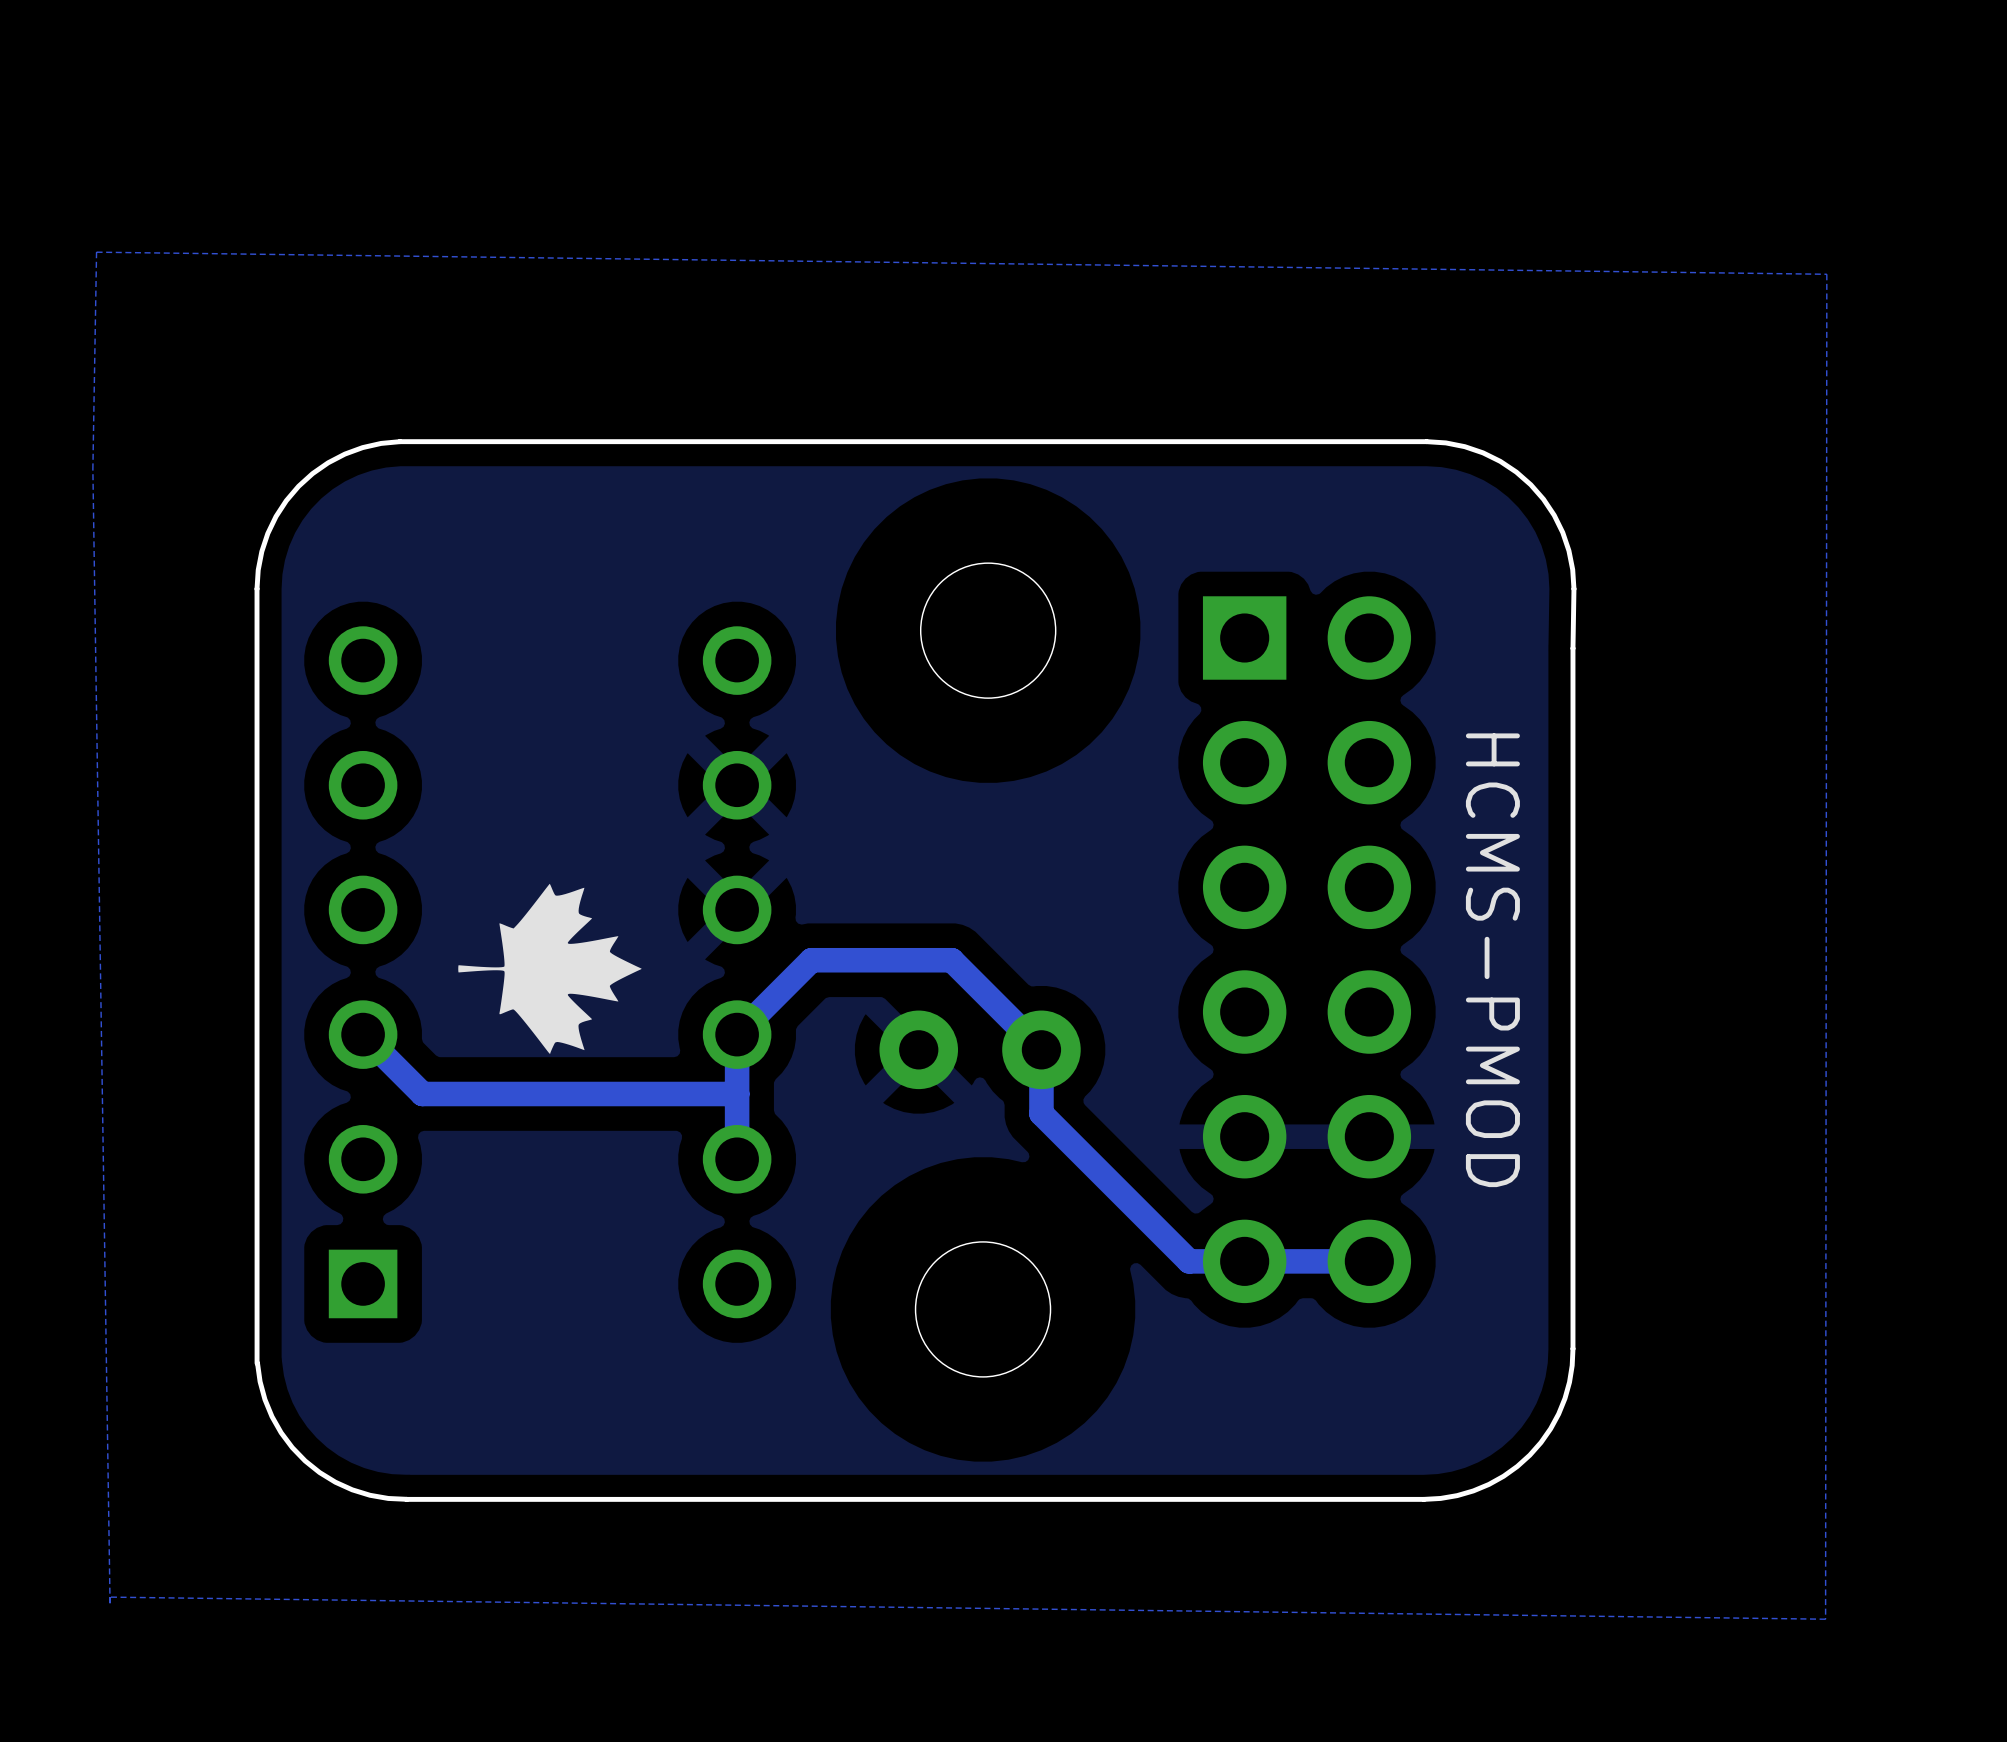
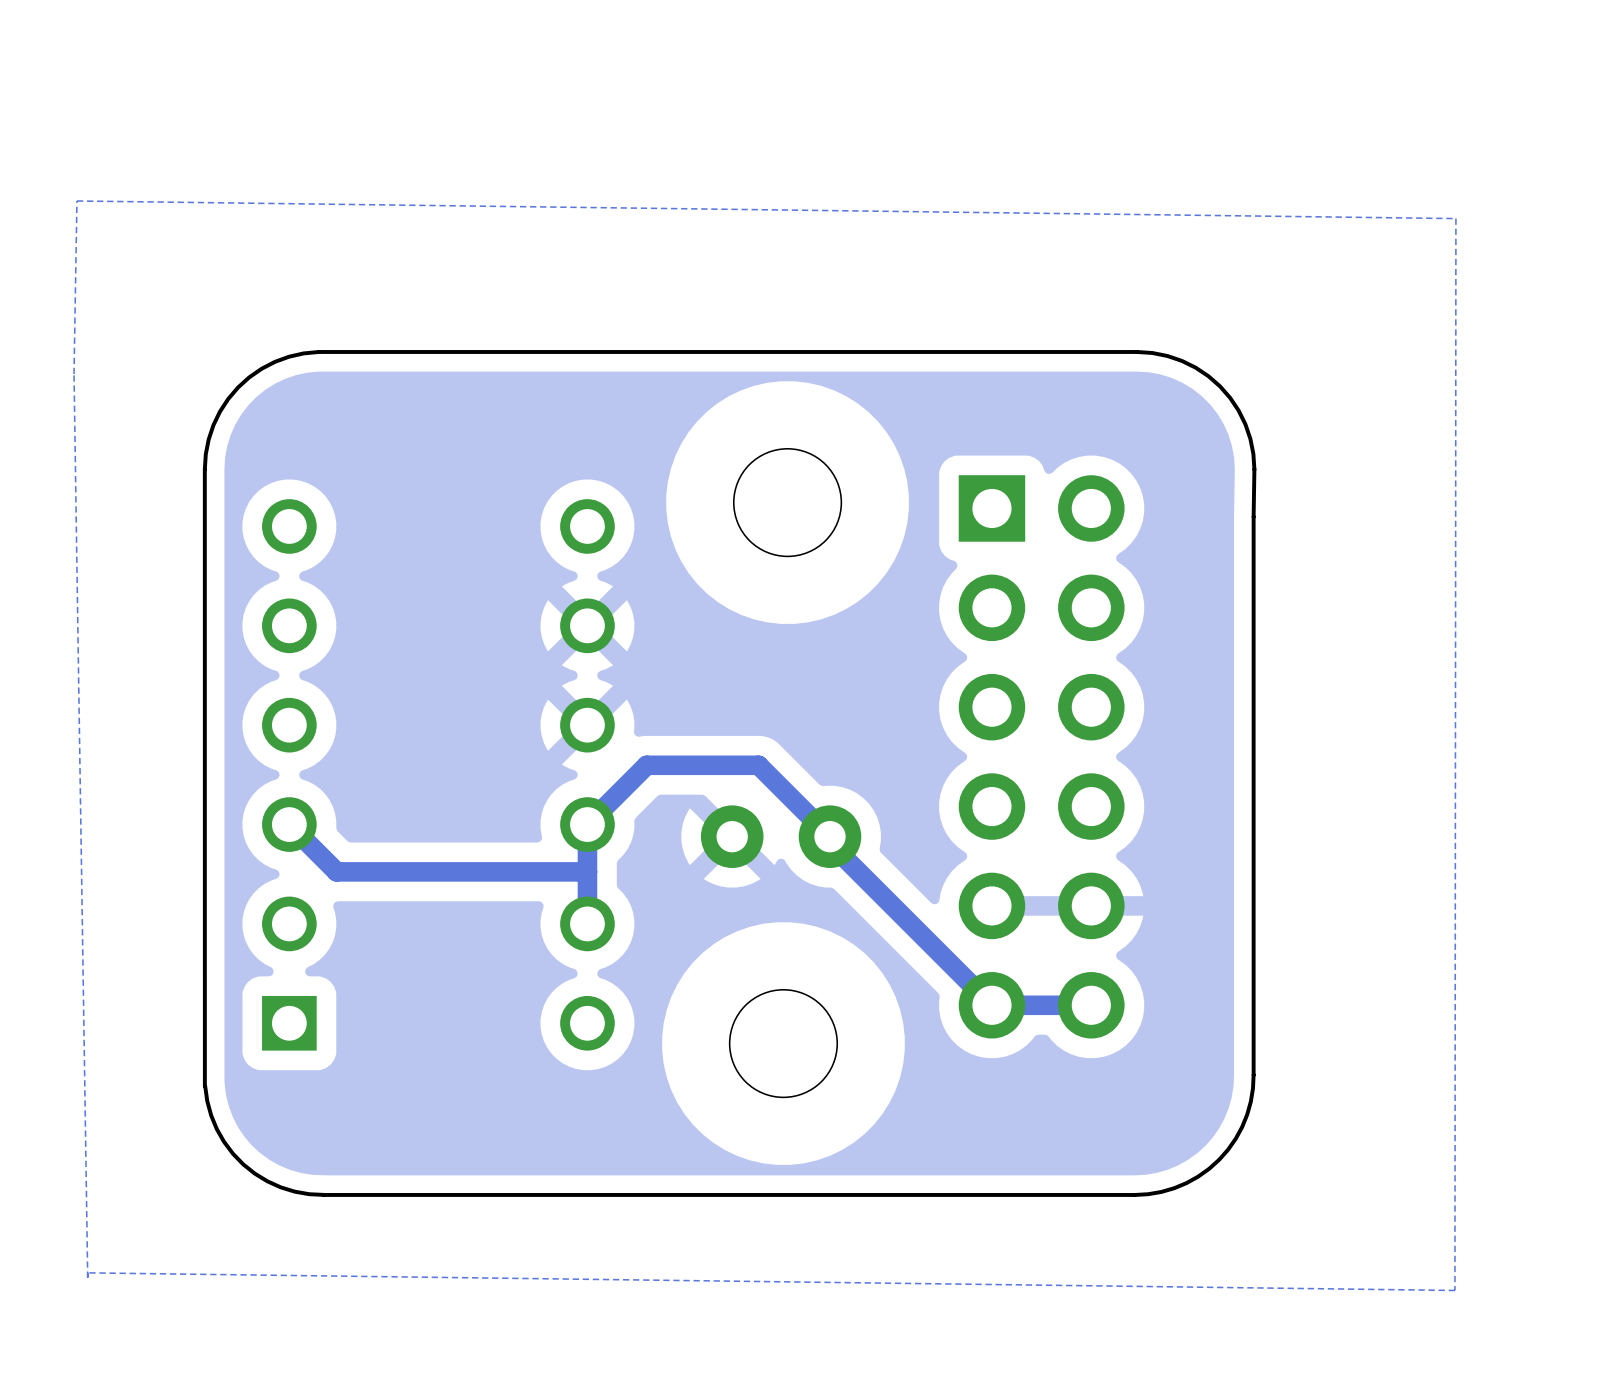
drawing: [458, 883, 642, 1054] -> none
text: HCMS-PMOD (1492, 960) -> none
track: (1041, 1058) (1041, 1113) (1189, 1261) (1244, 1261) -> (830, 843) (991, 1005)

